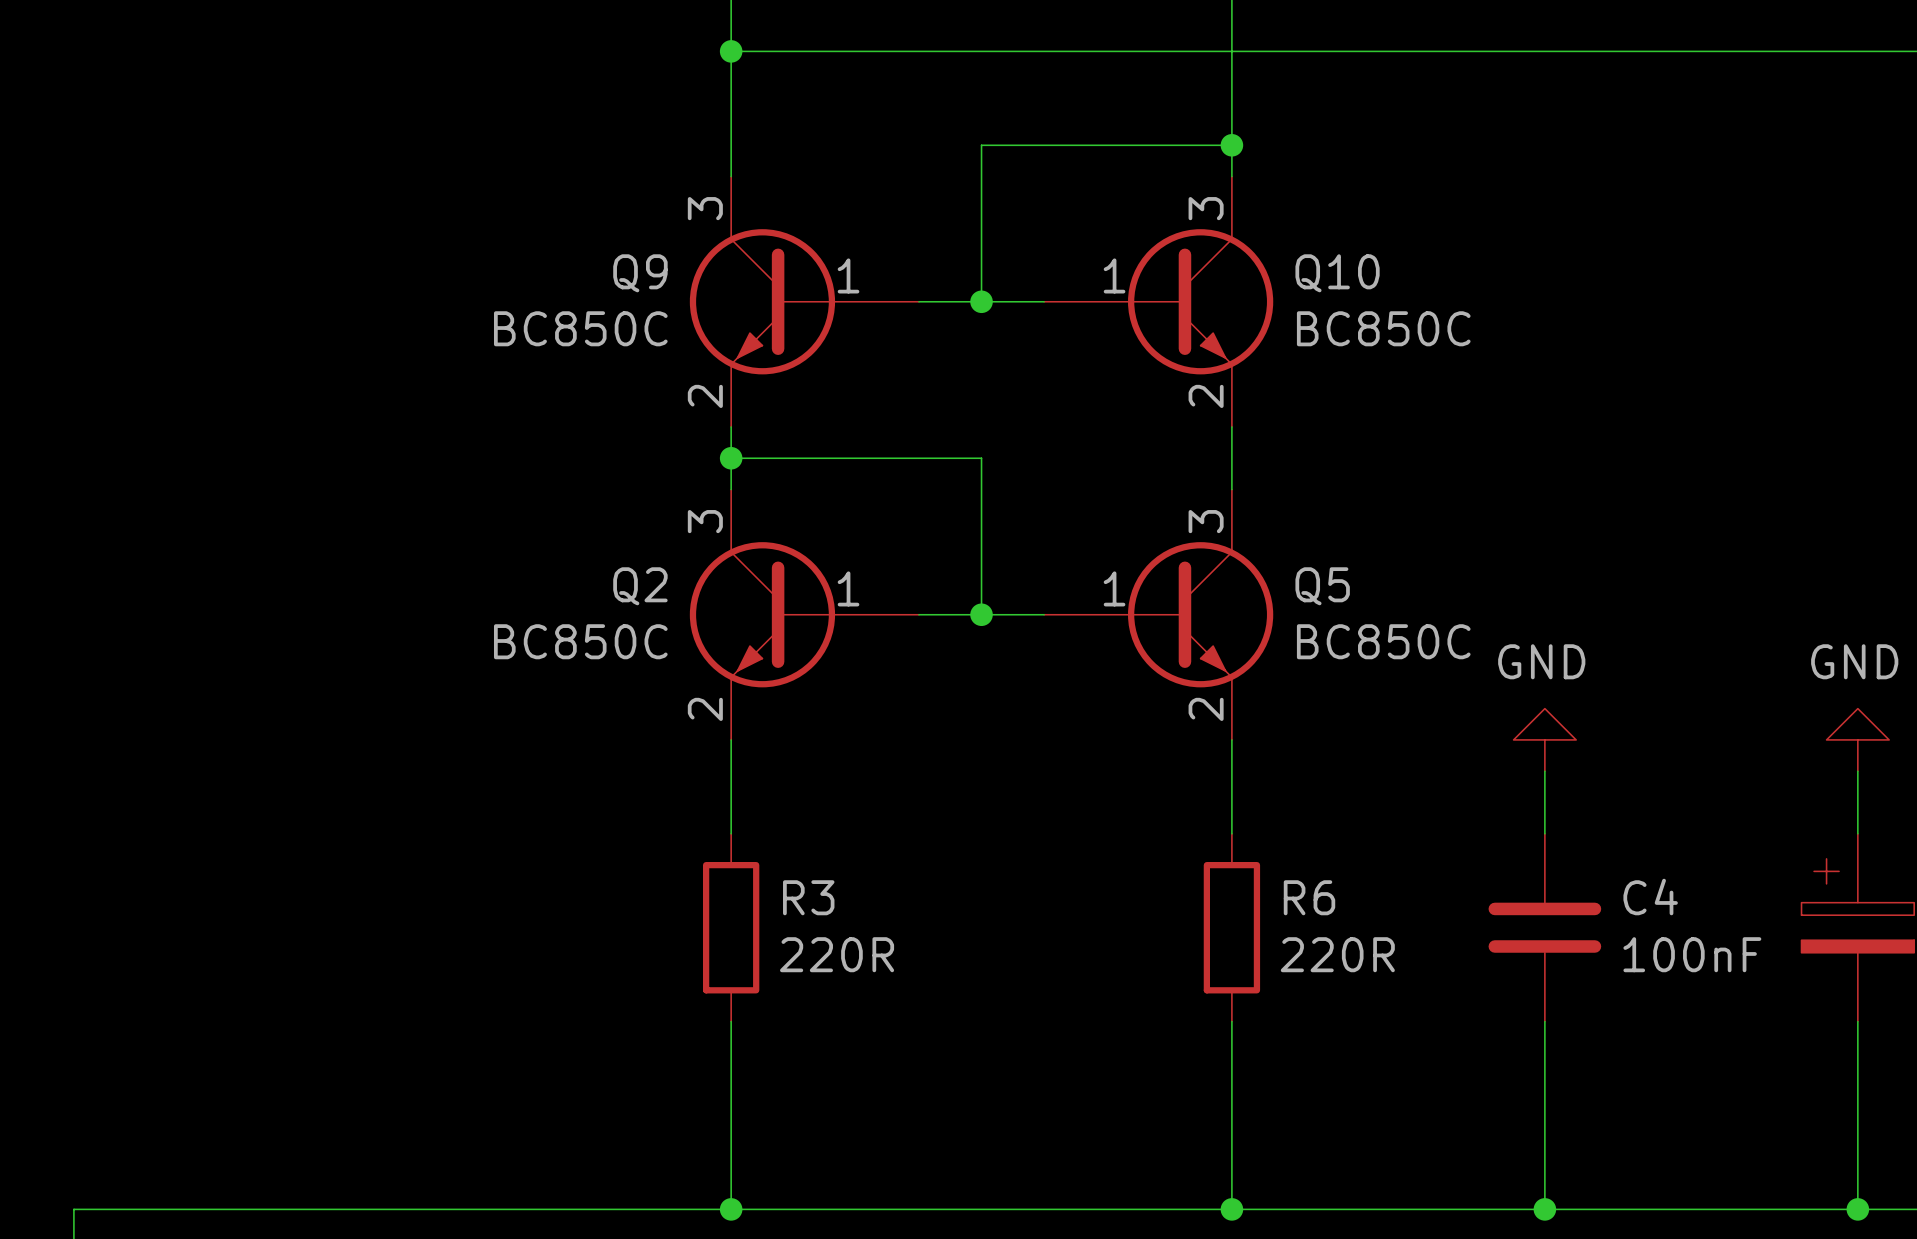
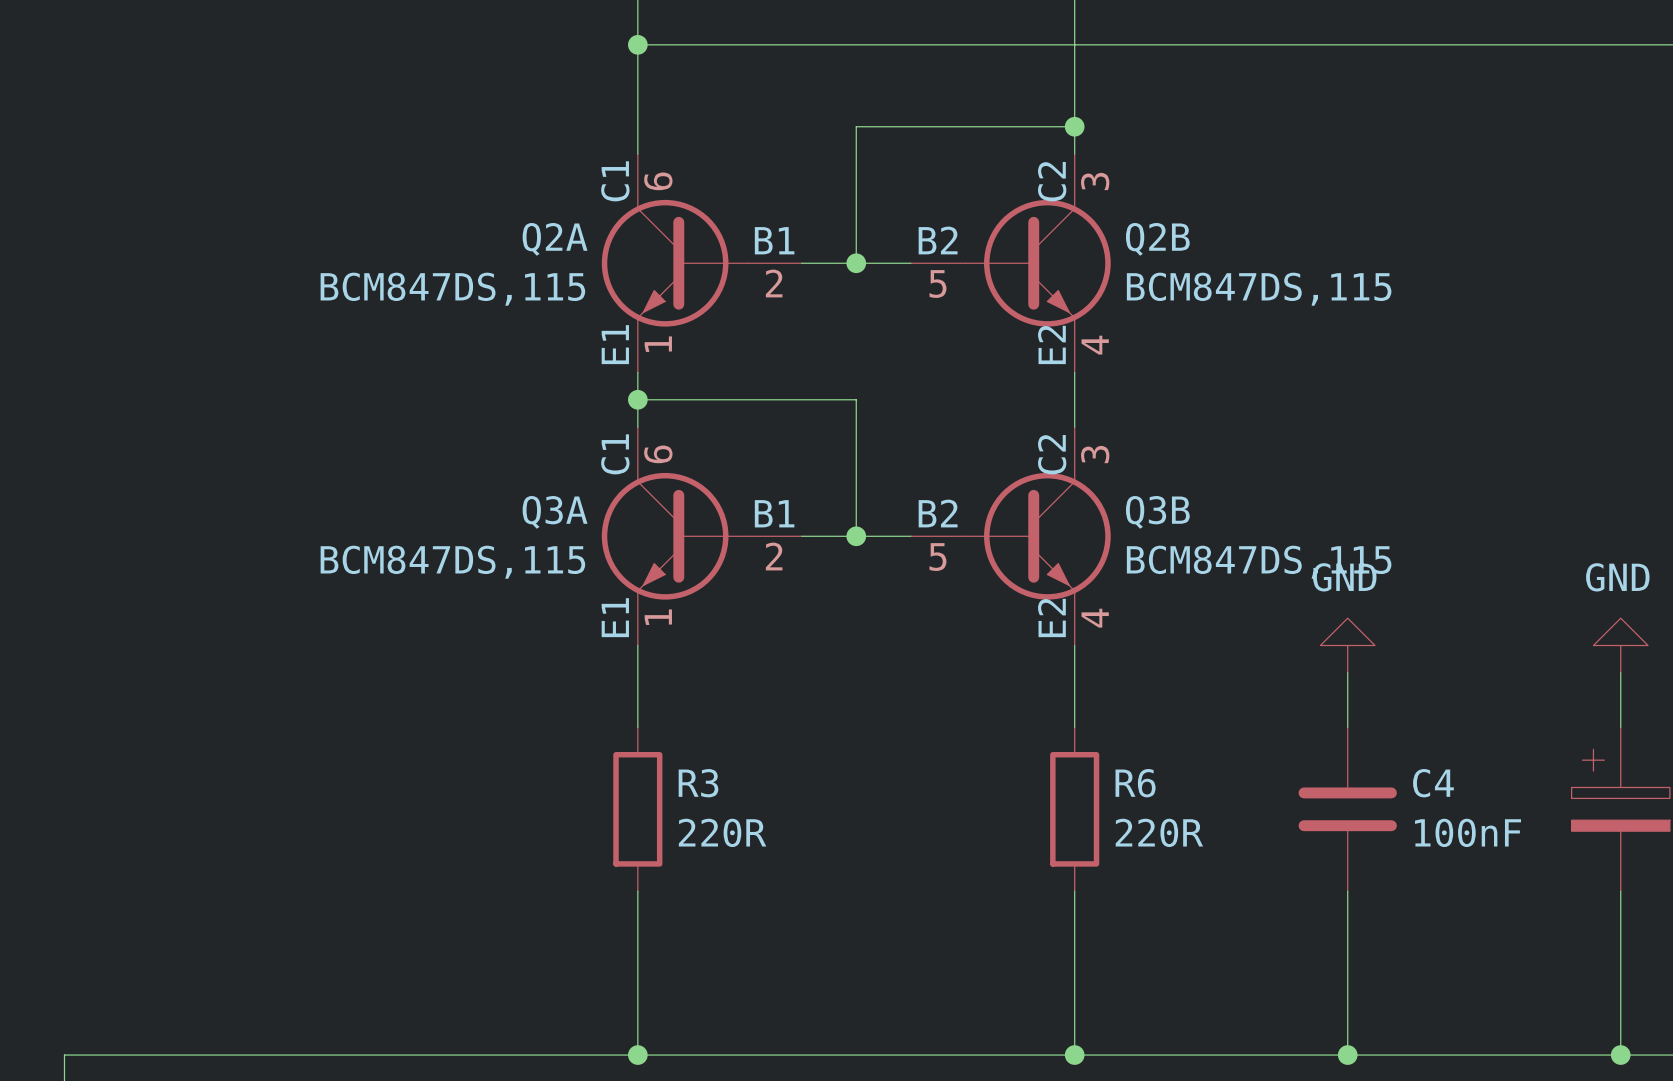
Q9: BC850C (804, 301) -> none
Q2A: none -> BCM847DS,115 (701, 263)
Q10: BC850C (1158, 301) -> none
Q2B: none -> BCM847DS,115 (1010, 263)
Q2: BC850C (804, 614) -> none
Q3A: none -> BCM847DS,115 (701, 536)
Q5: BC850C (1158, 614) -> none
Q3B: none -> BCM847DS,115 (1010, 536)

